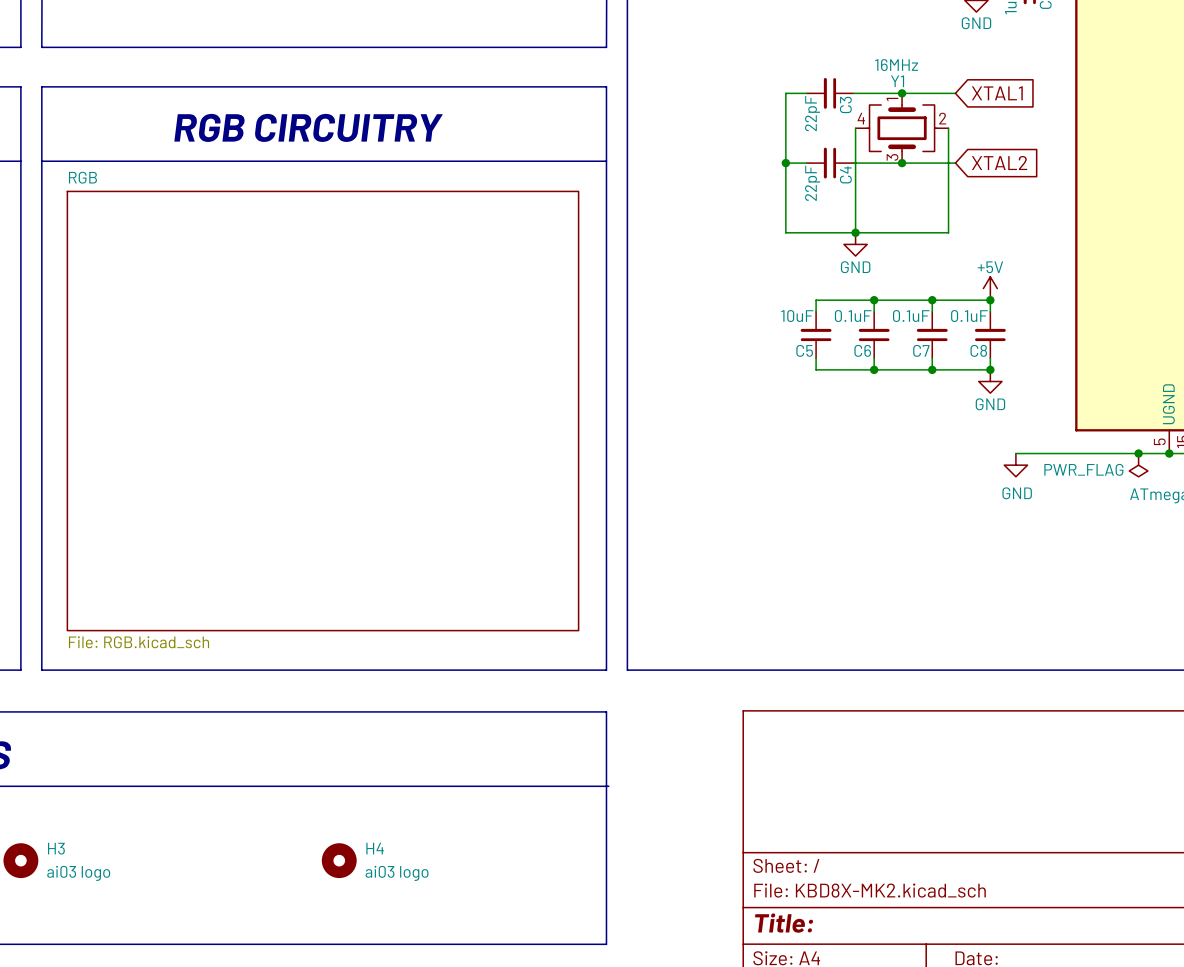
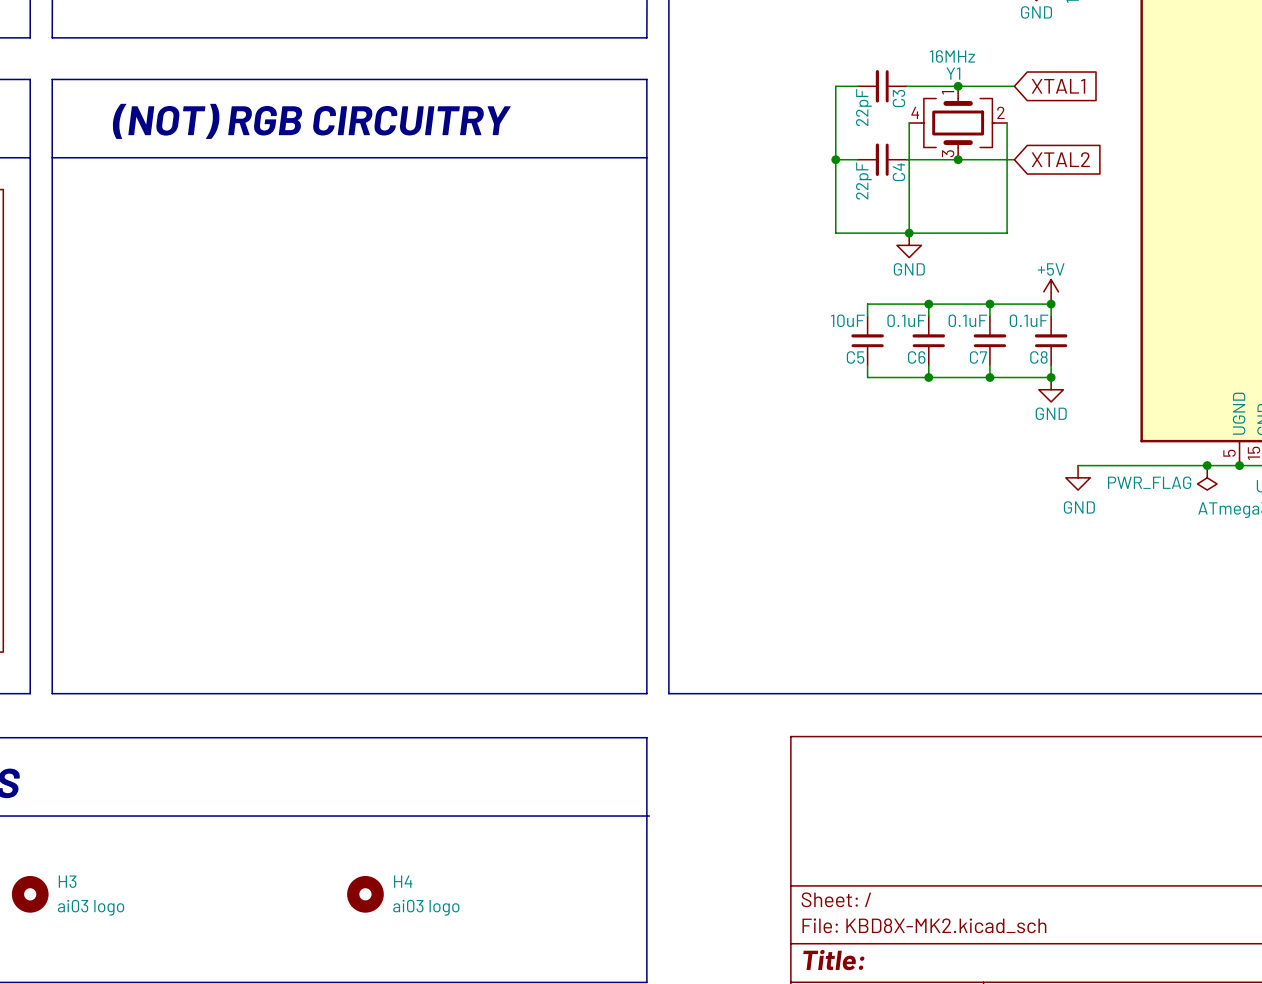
text: RGB CIRCUITRY (308, 127) -> (NOT) RGB CIRCUITRY (311, 121)
sheet RGB: File: RGB.kicad_sch (322, 411) -> none

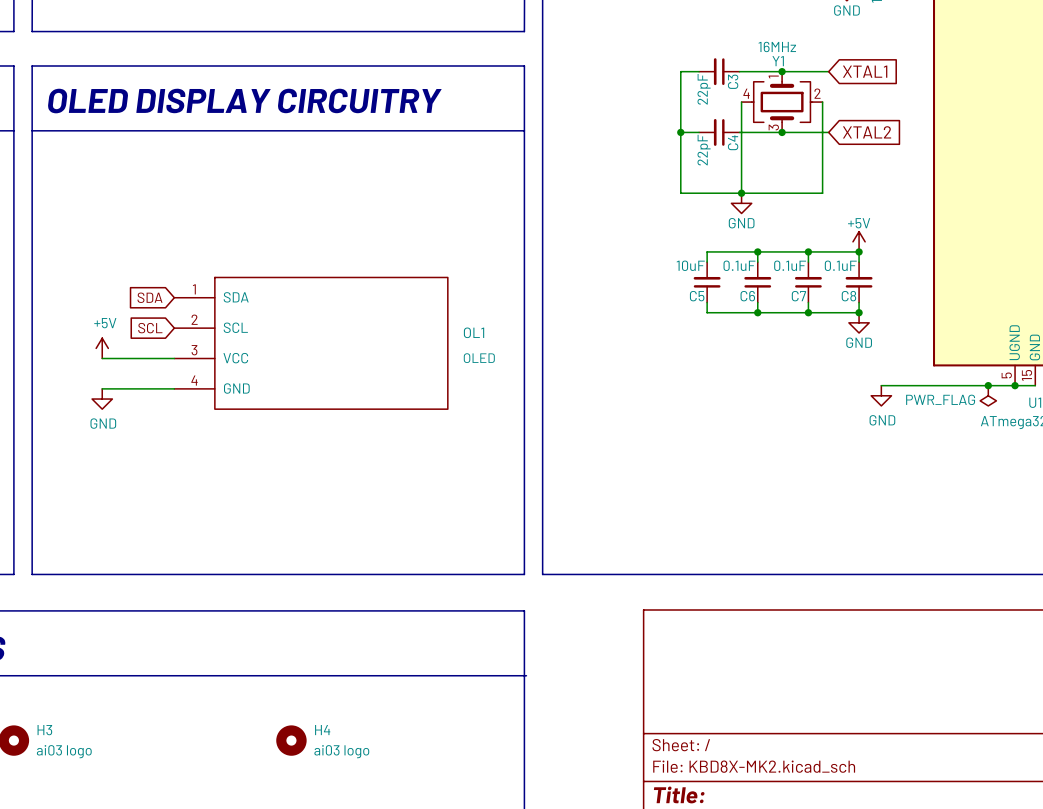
text: none -> OLED DISPLAY CIRCUITRY (244, 101)
text: (NOT) RGB CIRCUITRY (311, 121) -> none
global label: none -> SDA (149, 297)
global label: none -> SCL (150, 328)
OL1: none -> OLED (311, 343)
power symbol: none -> +5V (102, 348)
wire: none -> (102, 358) (174, 358)
wire: none -> (102, 388) (174, 388)
power symbol: none -> GND (102, 399)

